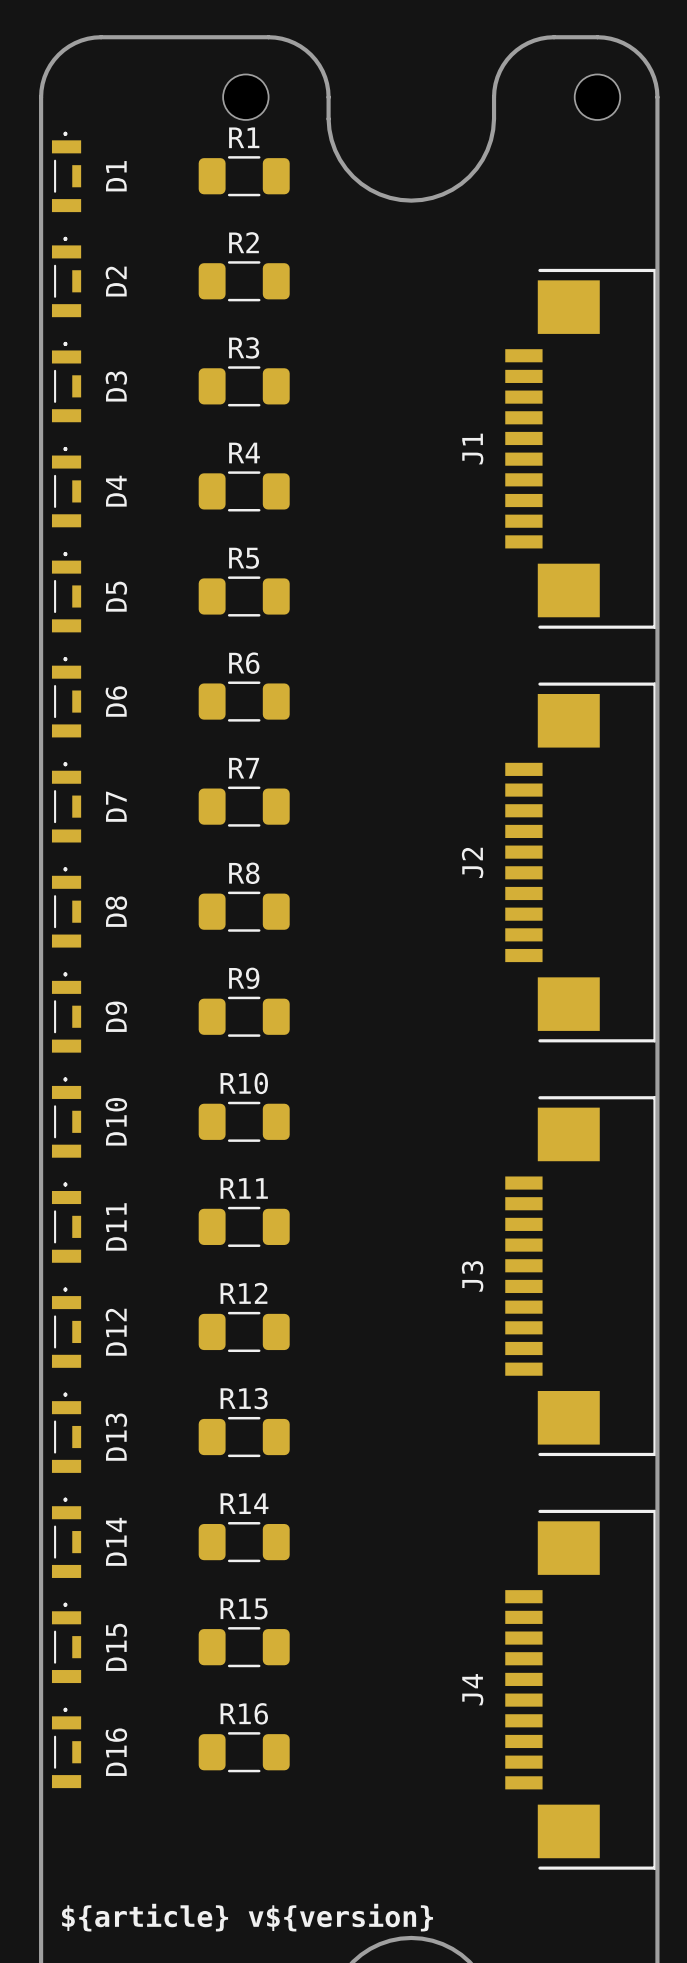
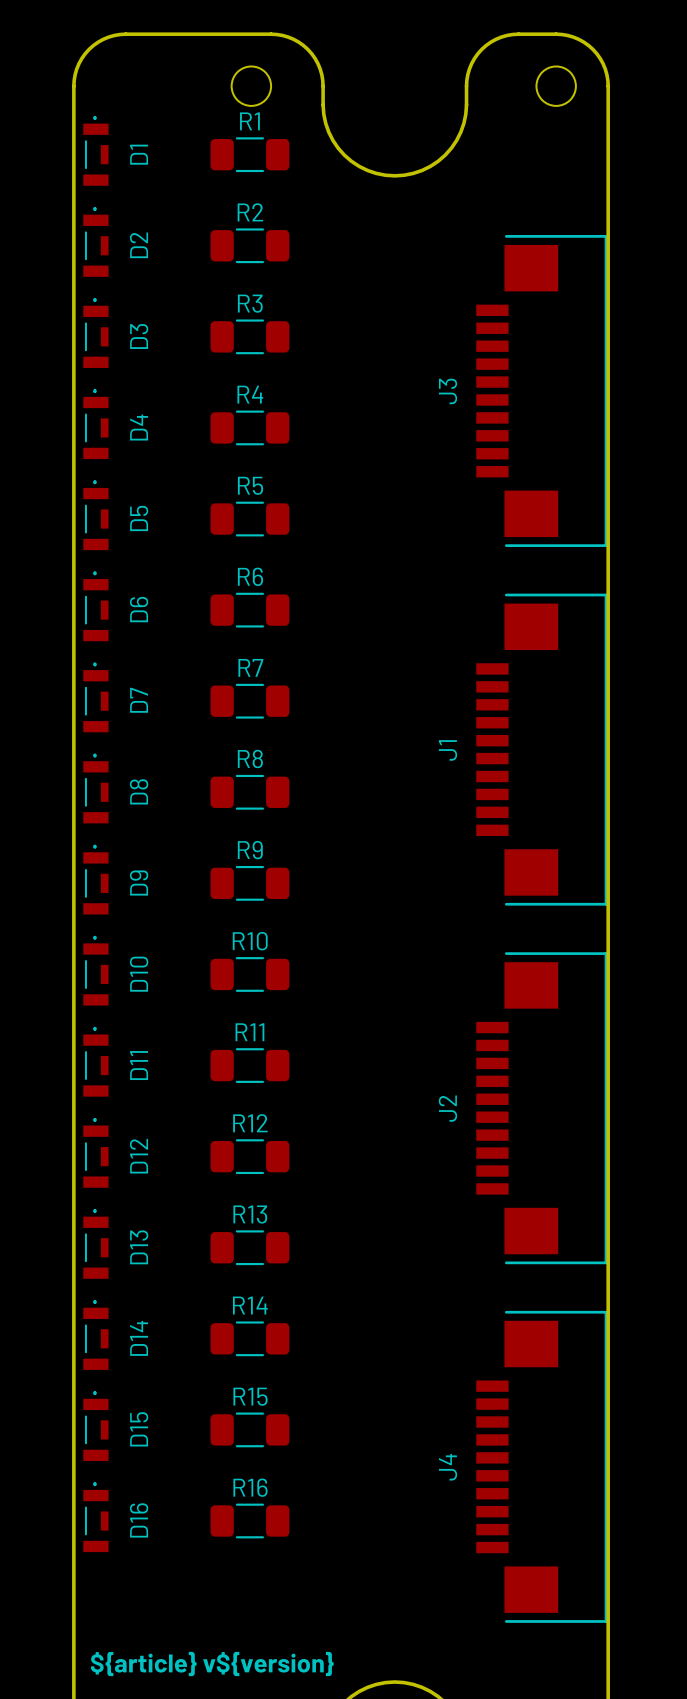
J1 name: J1 (472, 449) -> J3 (448, 391)
J2 name: J2 (472, 862) -> J1 (448, 750)
J3 name: J3 (472, 1276) -> J2 (447, 1108)

